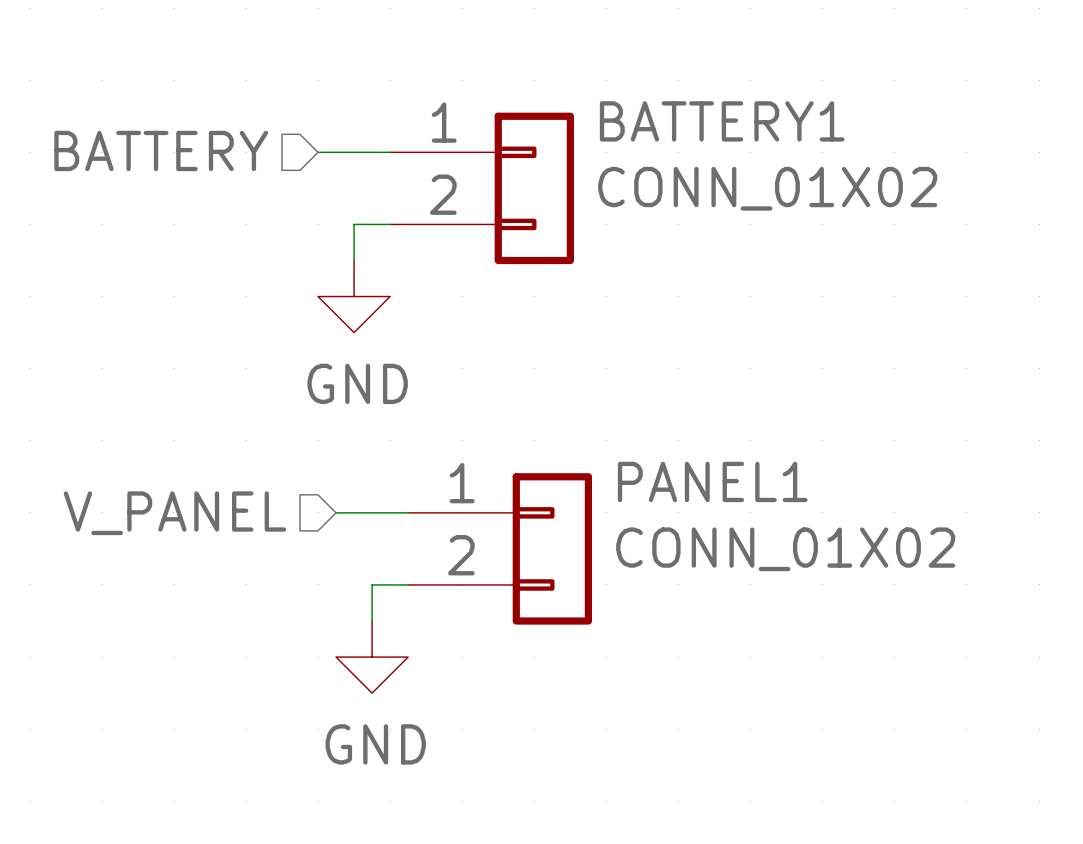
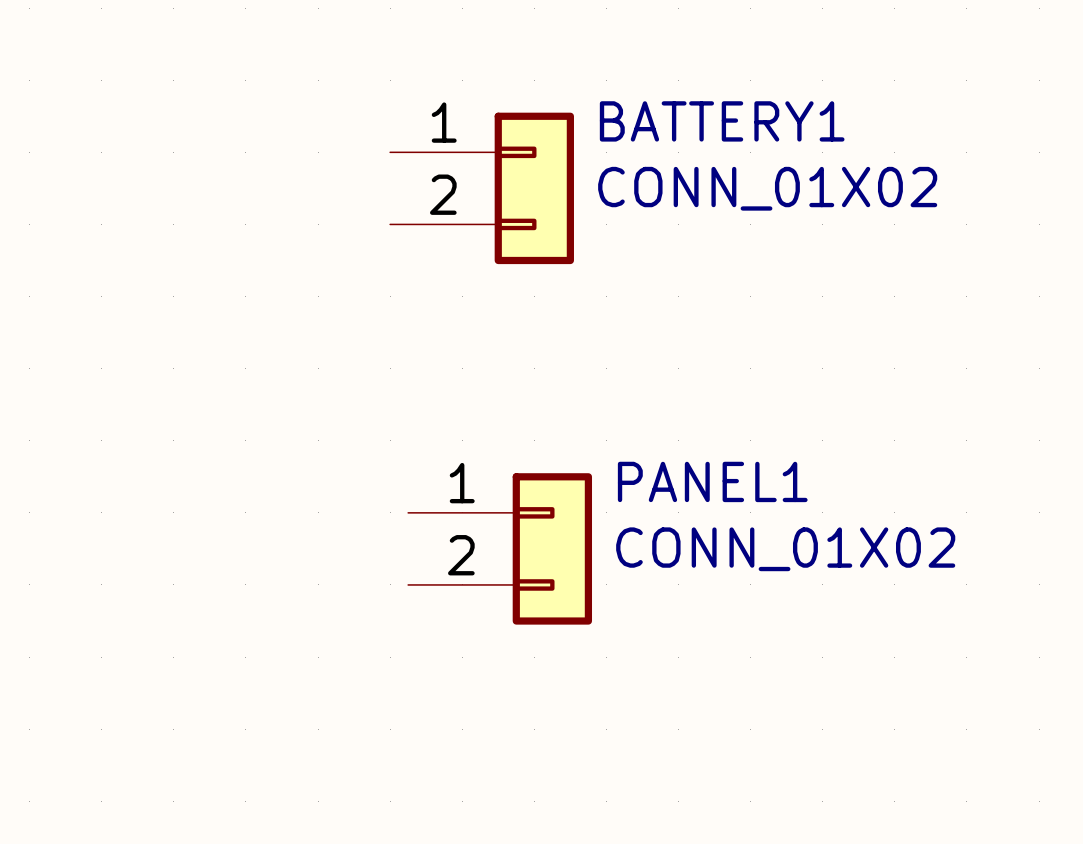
hierarchical label: BATTERY (161, 150) -> none
wire: (318, 152) (390, 152) -> none
wire: (390, 224) (354, 224) (354, 260) -> none
power symbol: GND (354, 296) -> none
wire: (336, 512) (408, 512) -> none
hierarchical label: V_PANEL (174, 513) -> none
wire: (408, 584) (372, 584) (372, 621) -> none
power symbol: GND (372, 657) -> none

